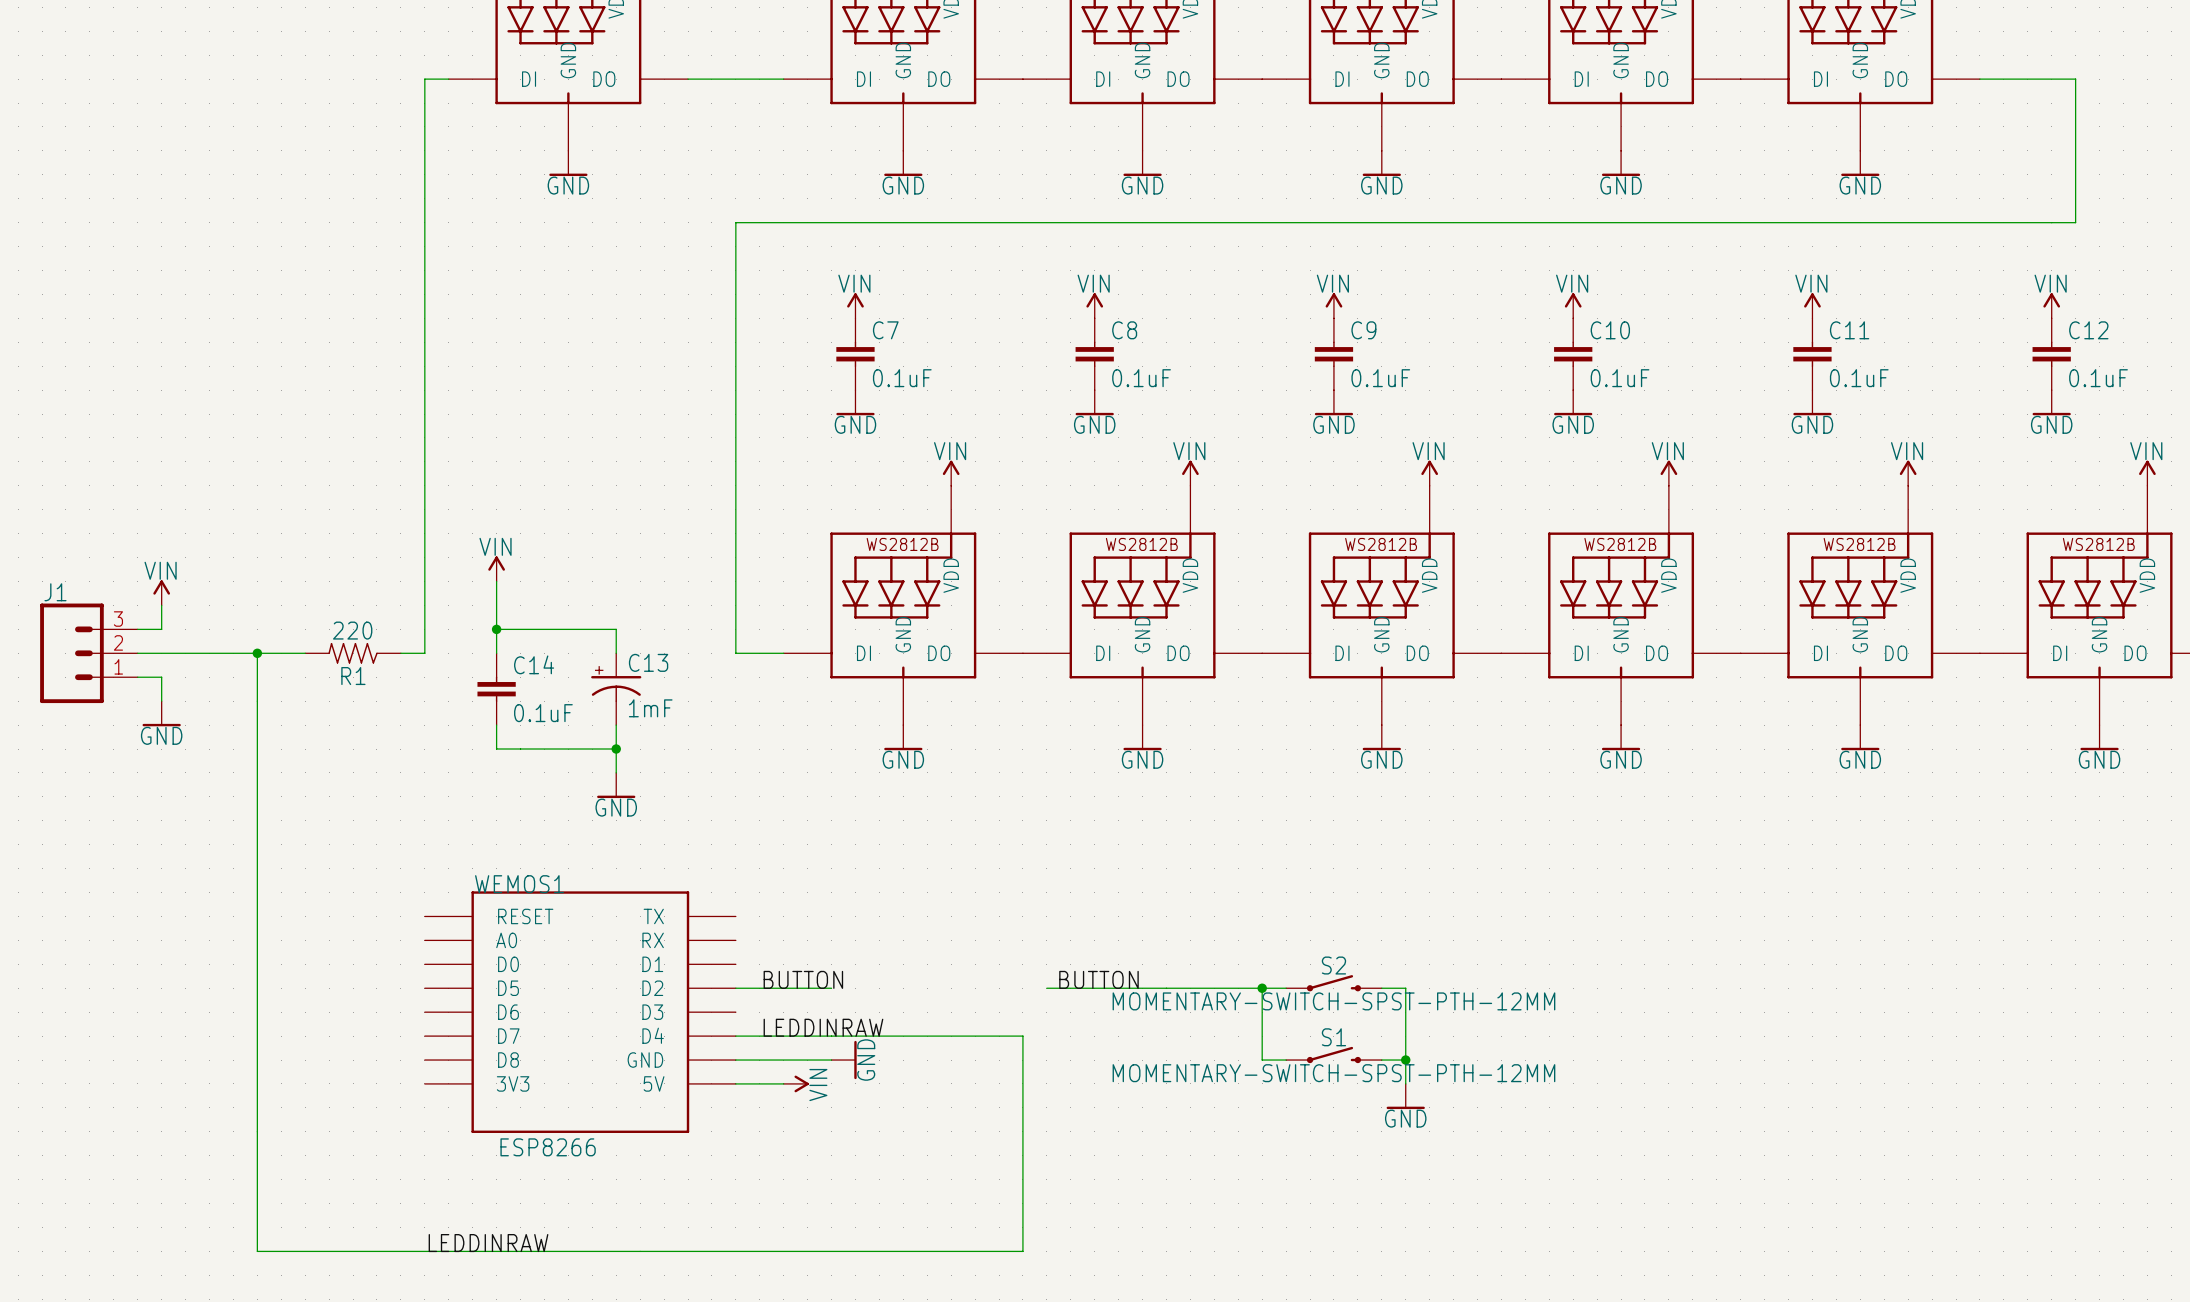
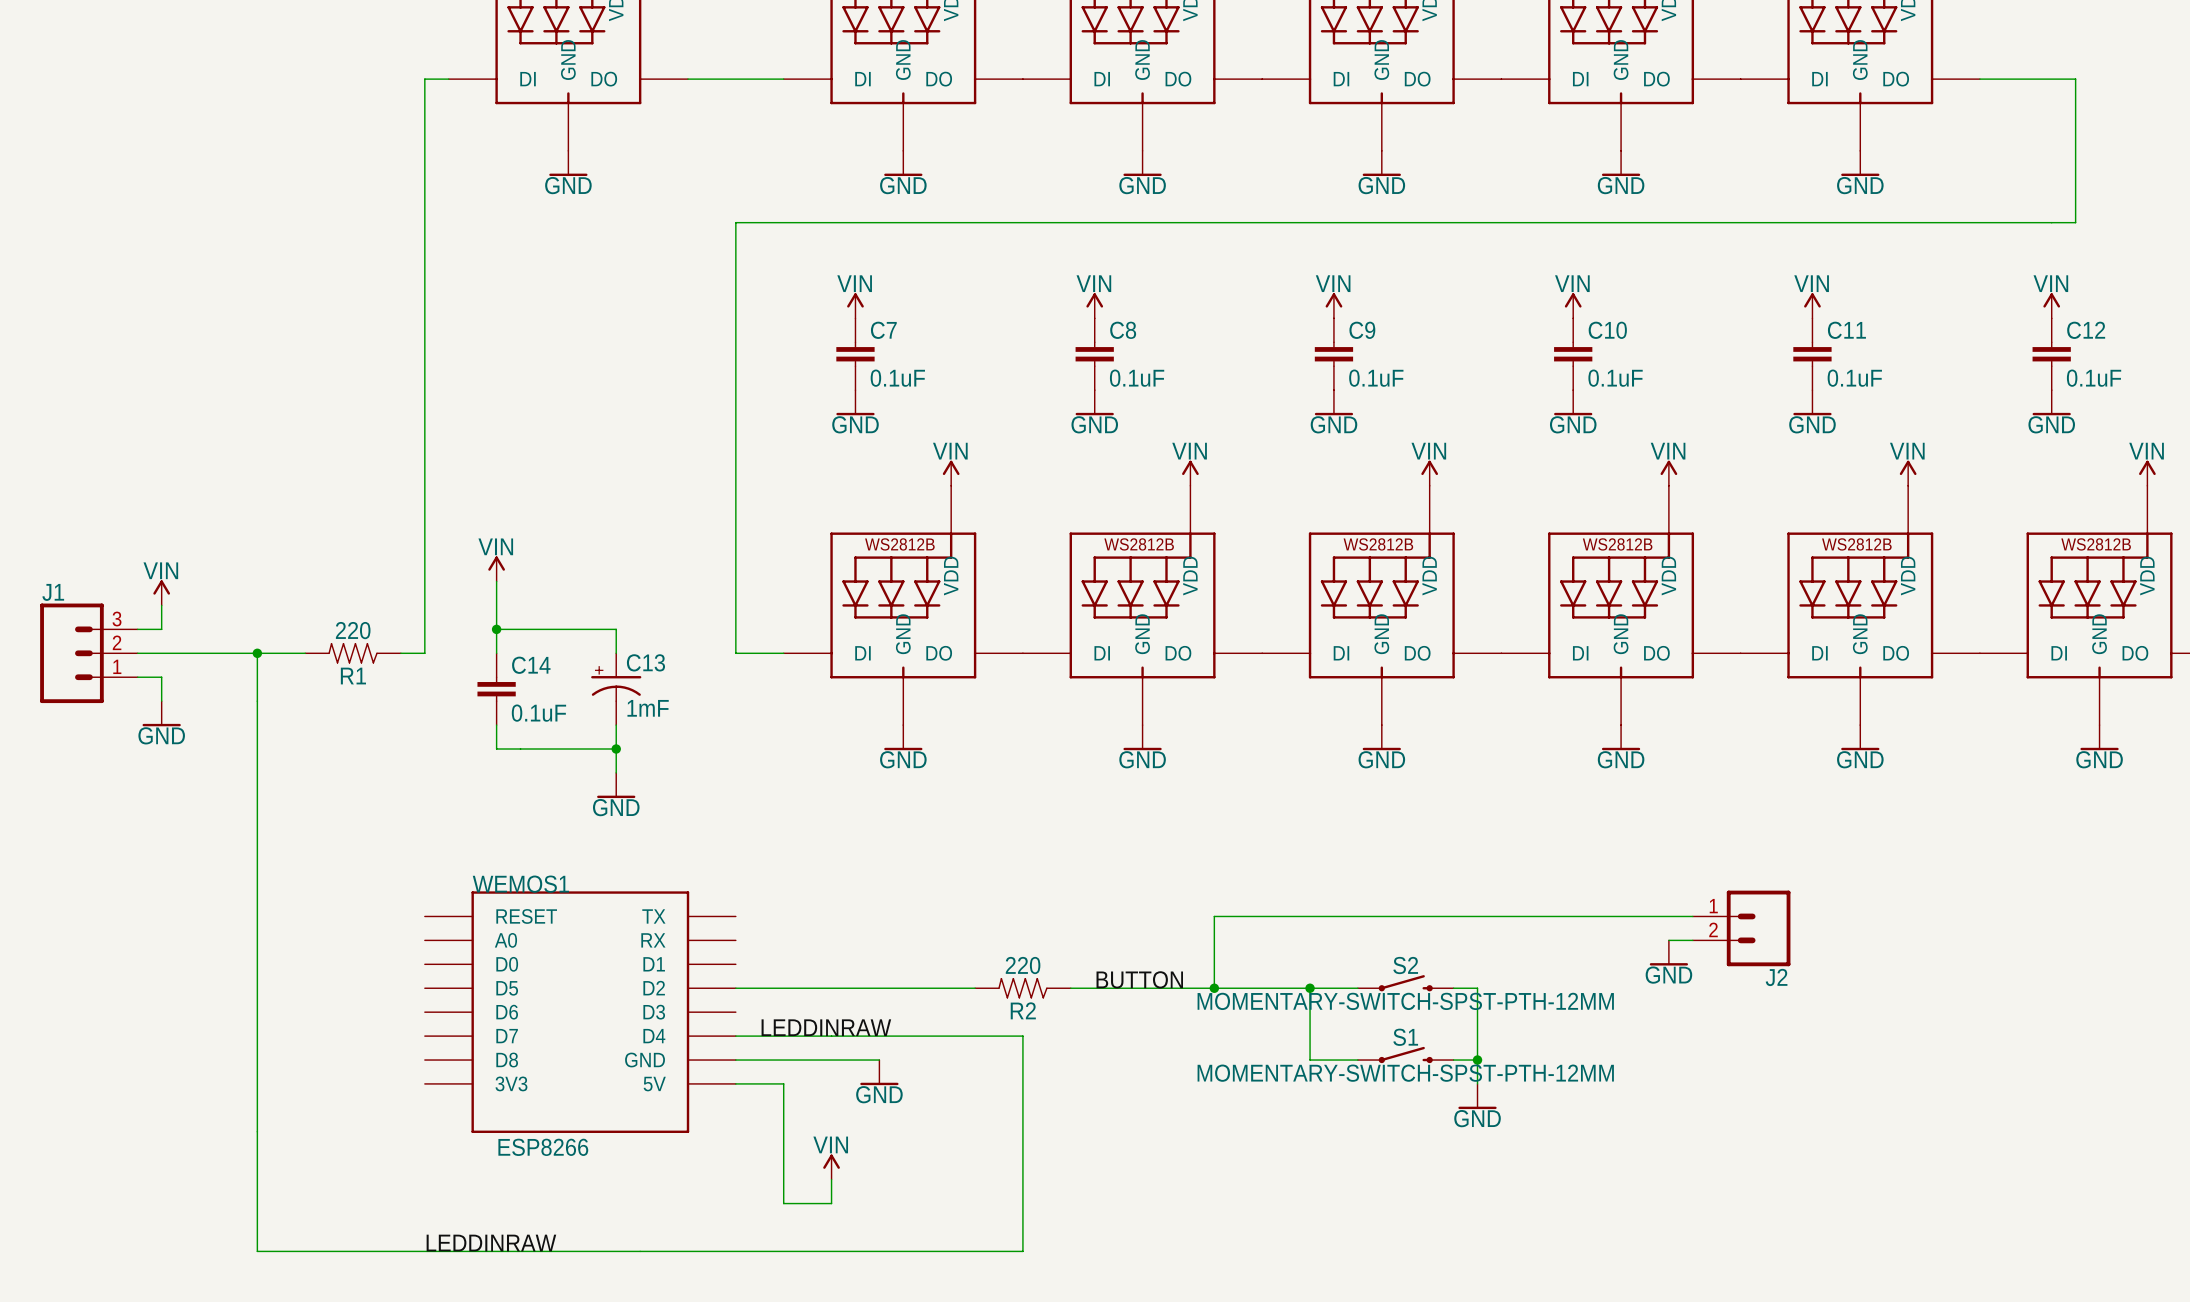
wire: none -> (1692, 916) (1214, 916) (1214, 988)
J2: none -> (1741, 928)
wire: none -> (1668, 940) (1692, 940)
power symbol: none -> GND (1668, 952)
label: BUTTON (803, 979) -> none
label position: BUTTON (1098, 979) -> BUTTON (1139, 979)
S2 position: (1333, 983) -> (1405, 983)
wire: none -> (831, 988) (975, 988)
R2: none -> 220 (1022, 988)
junction: none -> (1214, 988)
wire: (1262, 988) (1262, 1060) (1286, 1060) -> none
junction: (1262, 988) -> none
wire: none -> (1286, 988) (1357, 988)
wire: none -> (1310, 988) (1310, 1060) (1357, 1060)
junction: none -> (1310, 988)
wire: (1381, 988) (1405, 988) (1405, 1083) -> (1453, 988) (1477, 988) (1477, 1083)
S1 position: (1333, 1054) -> (1405, 1054)
power symbol position: GND (844, 1060) -> GND (879, 1072)
power symbol rotation: 0° (855, 1060) -> 90° clockwise (879, 1083)
wire: (1381, 1060) (1405, 1060) -> (1453, 1060) (1477, 1060)
junction: (1405, 1060) -> none
junction: none -> (1477, 1060)
wire: none -> (783, 1083) (783, 1203) (831, 1203) (831, 1179)
power symbol position: VIN (796, 1083) -> VIN (831, 1167)
power symbol rotation: 0° (801, 1083) -> 90° counterclockwise (831, 1161)
power symbol position: GND (1405, 1096) -> GND (1477, 1096)

